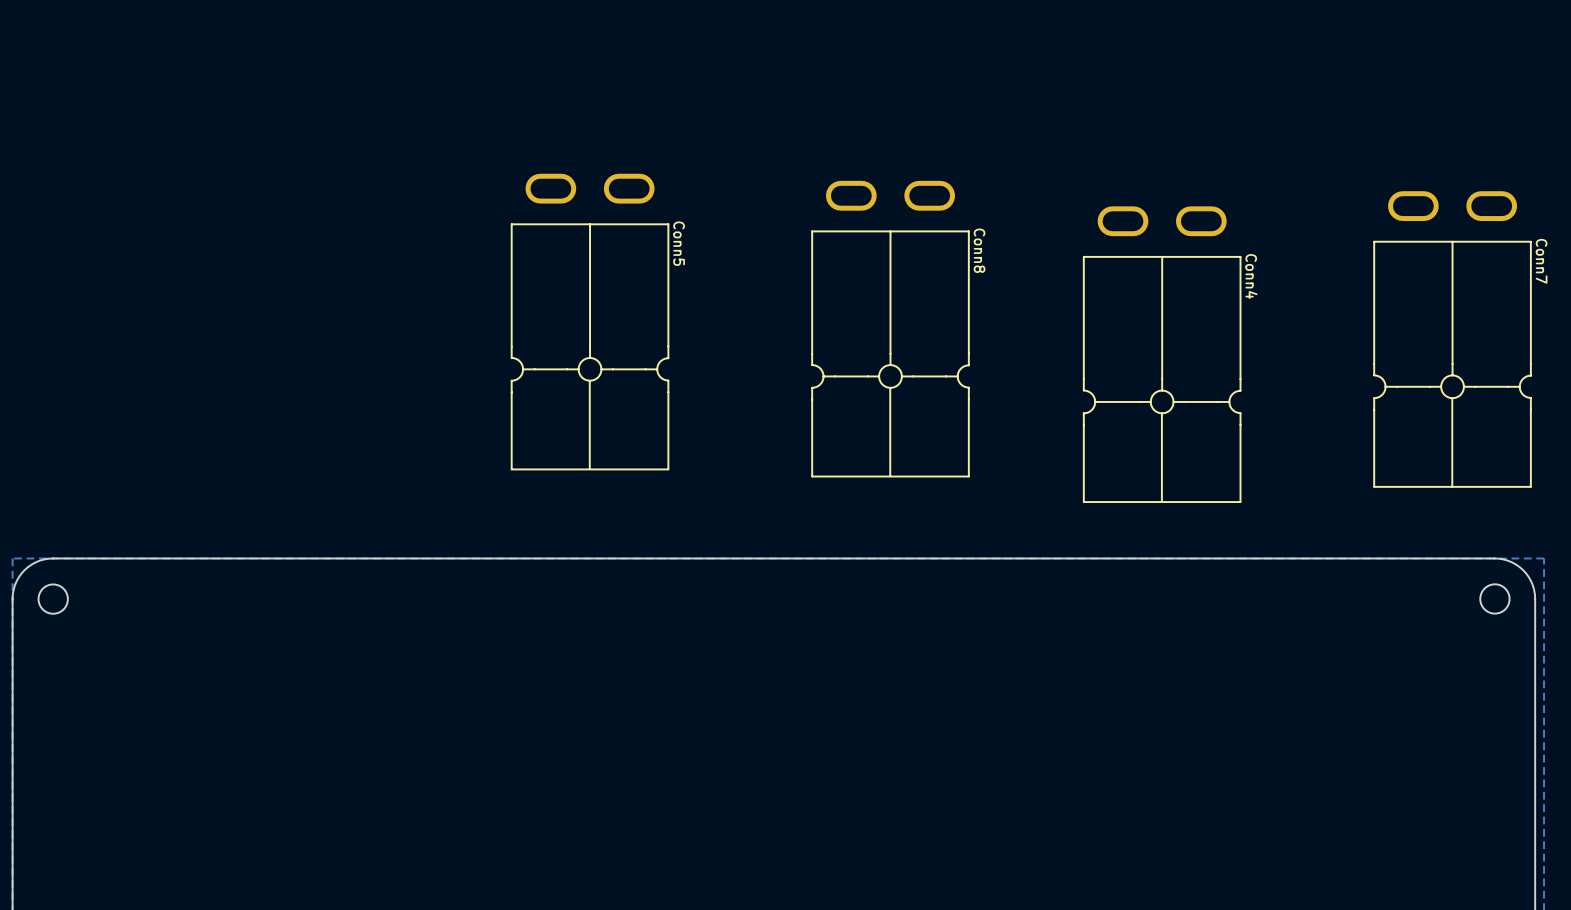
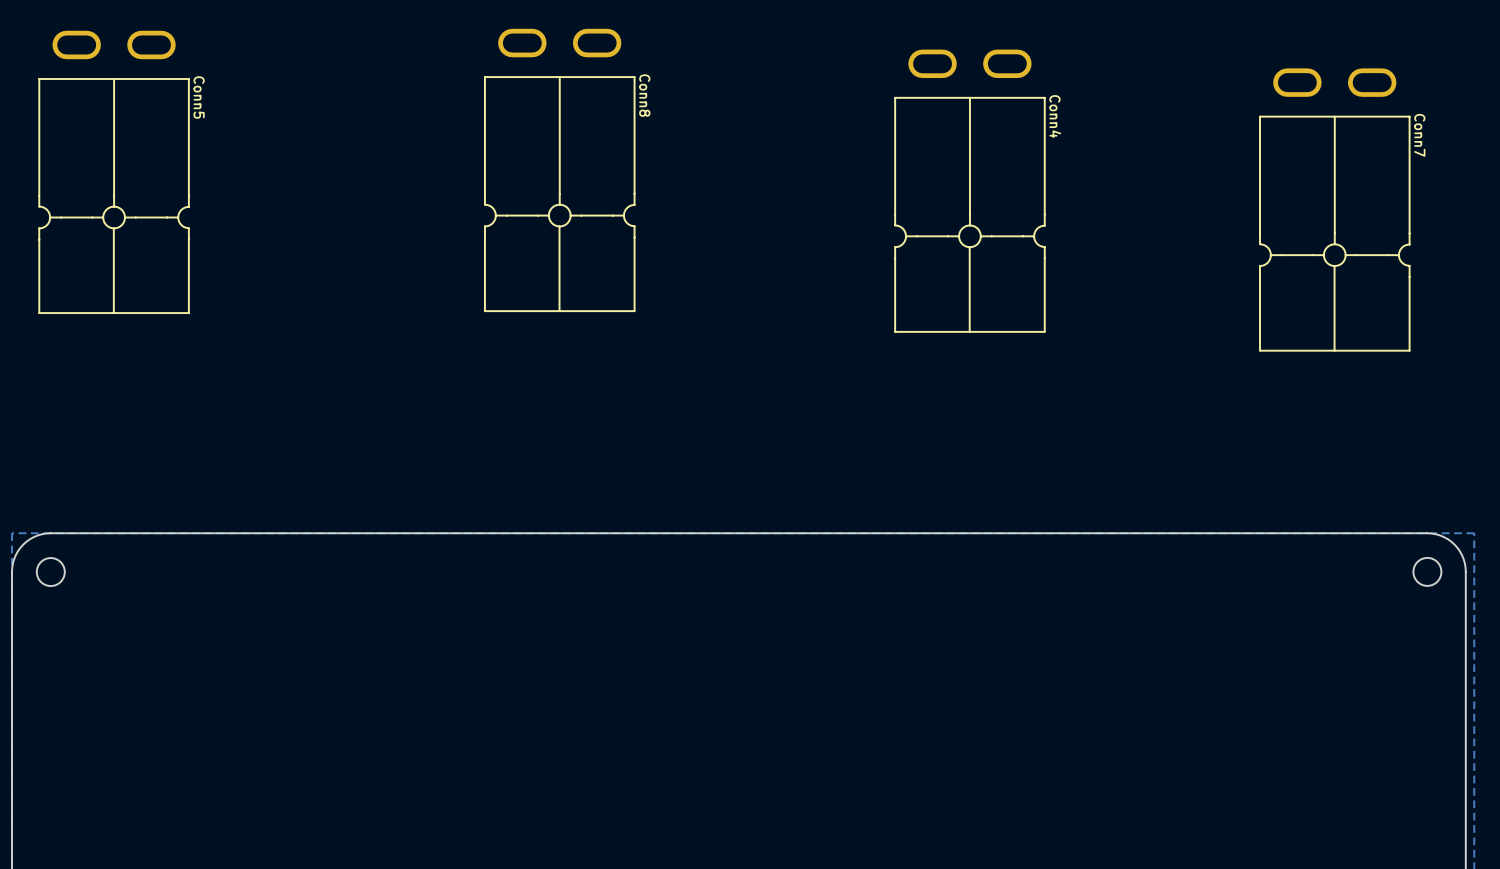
Conn5 position: (590, 321) -> (114, 172)
Conn8 position: (890, 329) -> (559, 170)
Conn7 position: (1452, 339) -> (1334, 209)
Conn4 position: (1162, 354) -> (969, 191)

